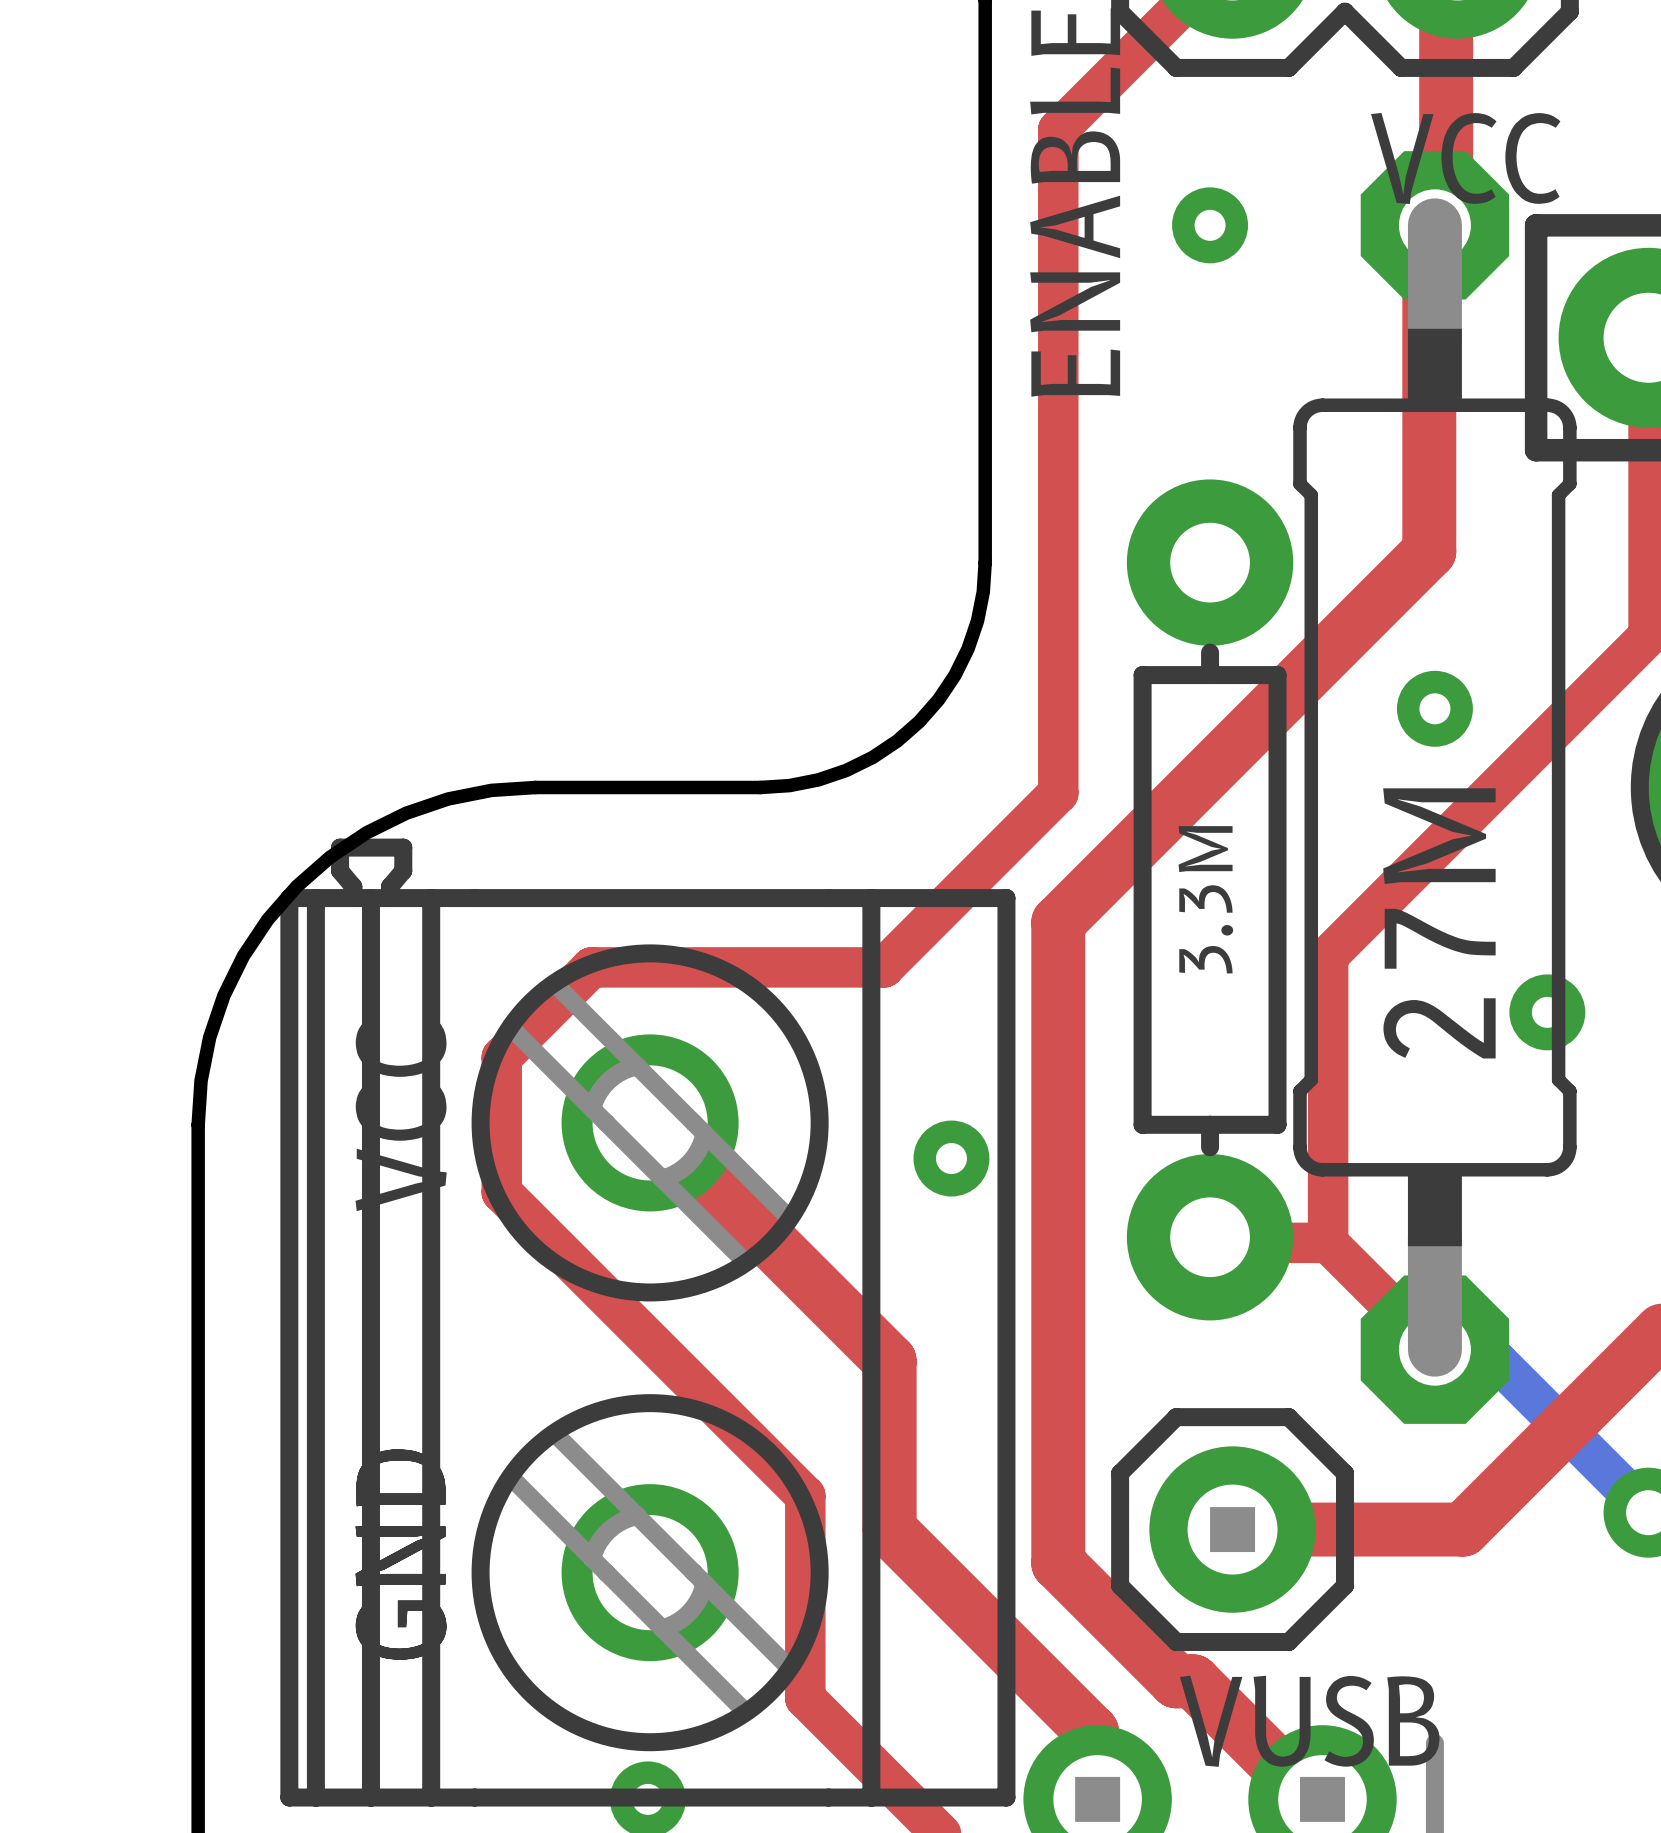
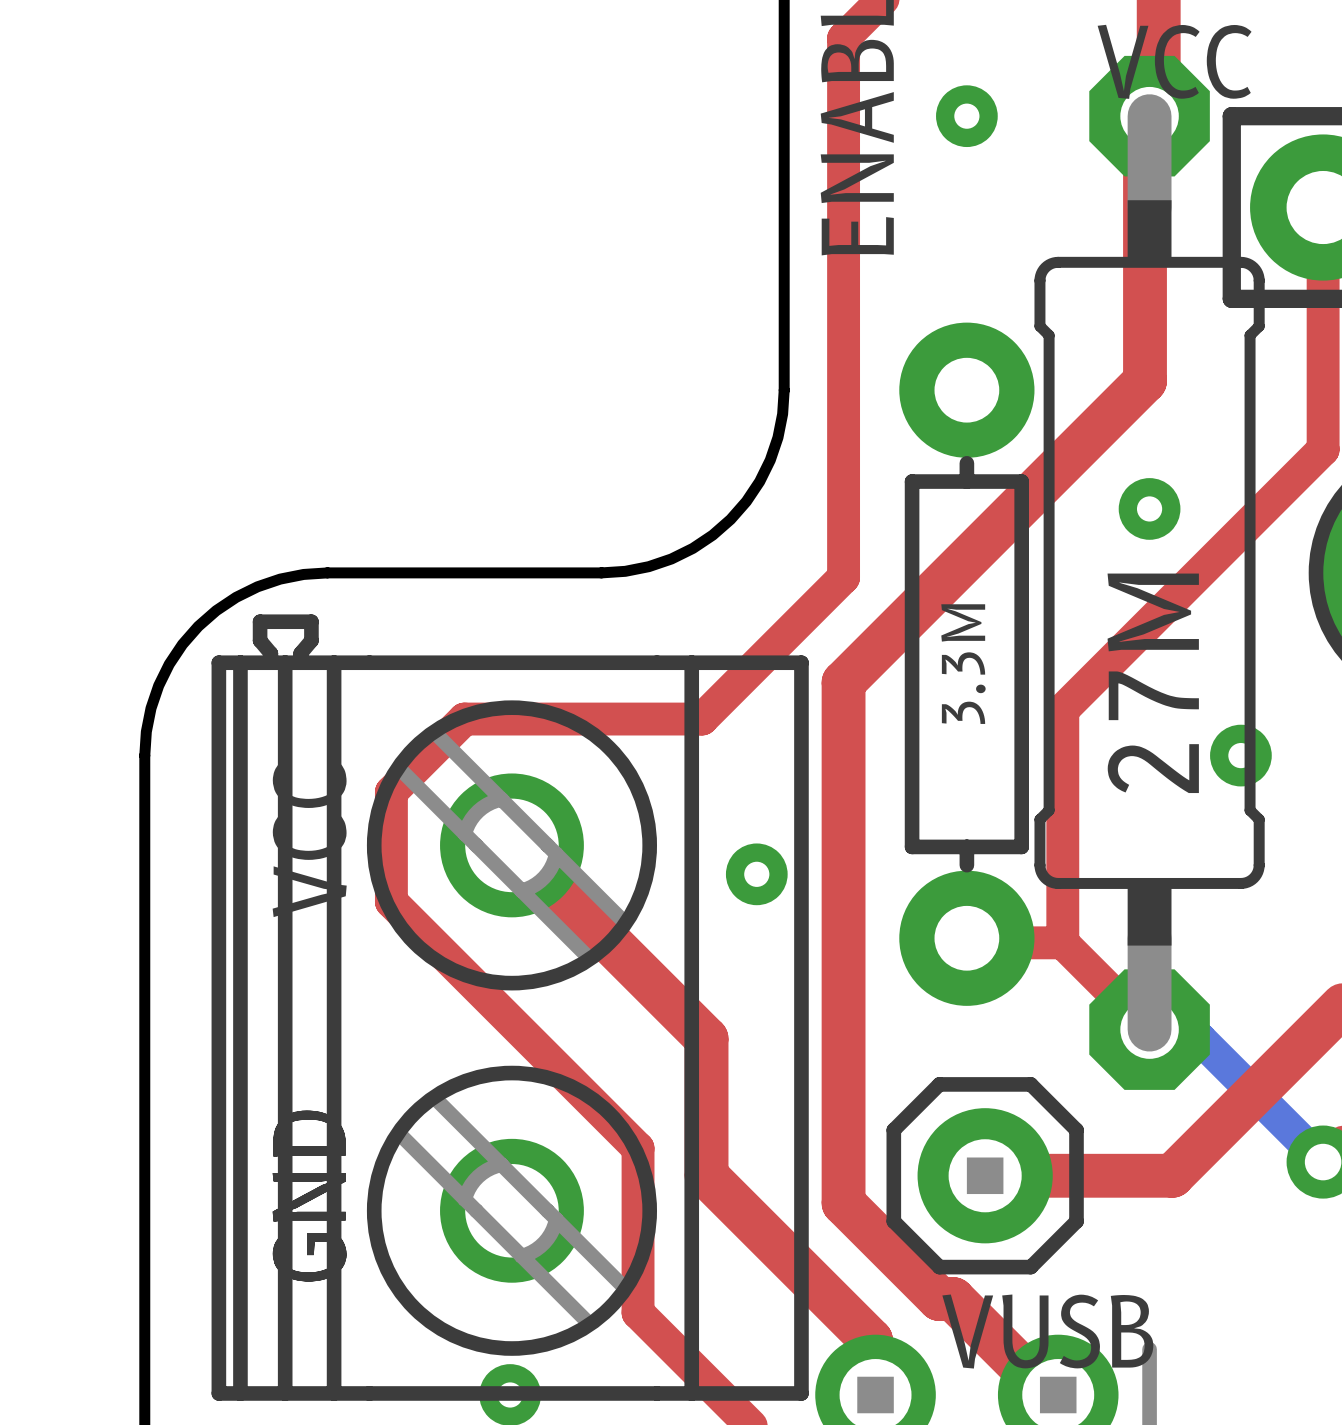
board edge: (535, 787) (491, 790) (448, 798) (406, 813) (366, 832) (330, 857) (296, 886) (267, 919) (243, 956) (223, 995) (209, 1037) (201, 1080) (198, 1124) -> (418, 572) (327, 572) (303, 574) (280, 579) (257, 586) (236, 597) (216, 610) (198, 626) (182, 644) (169, 664) (158, 685) (151, 708) (146, 731) (144, 755) (144, 846)

